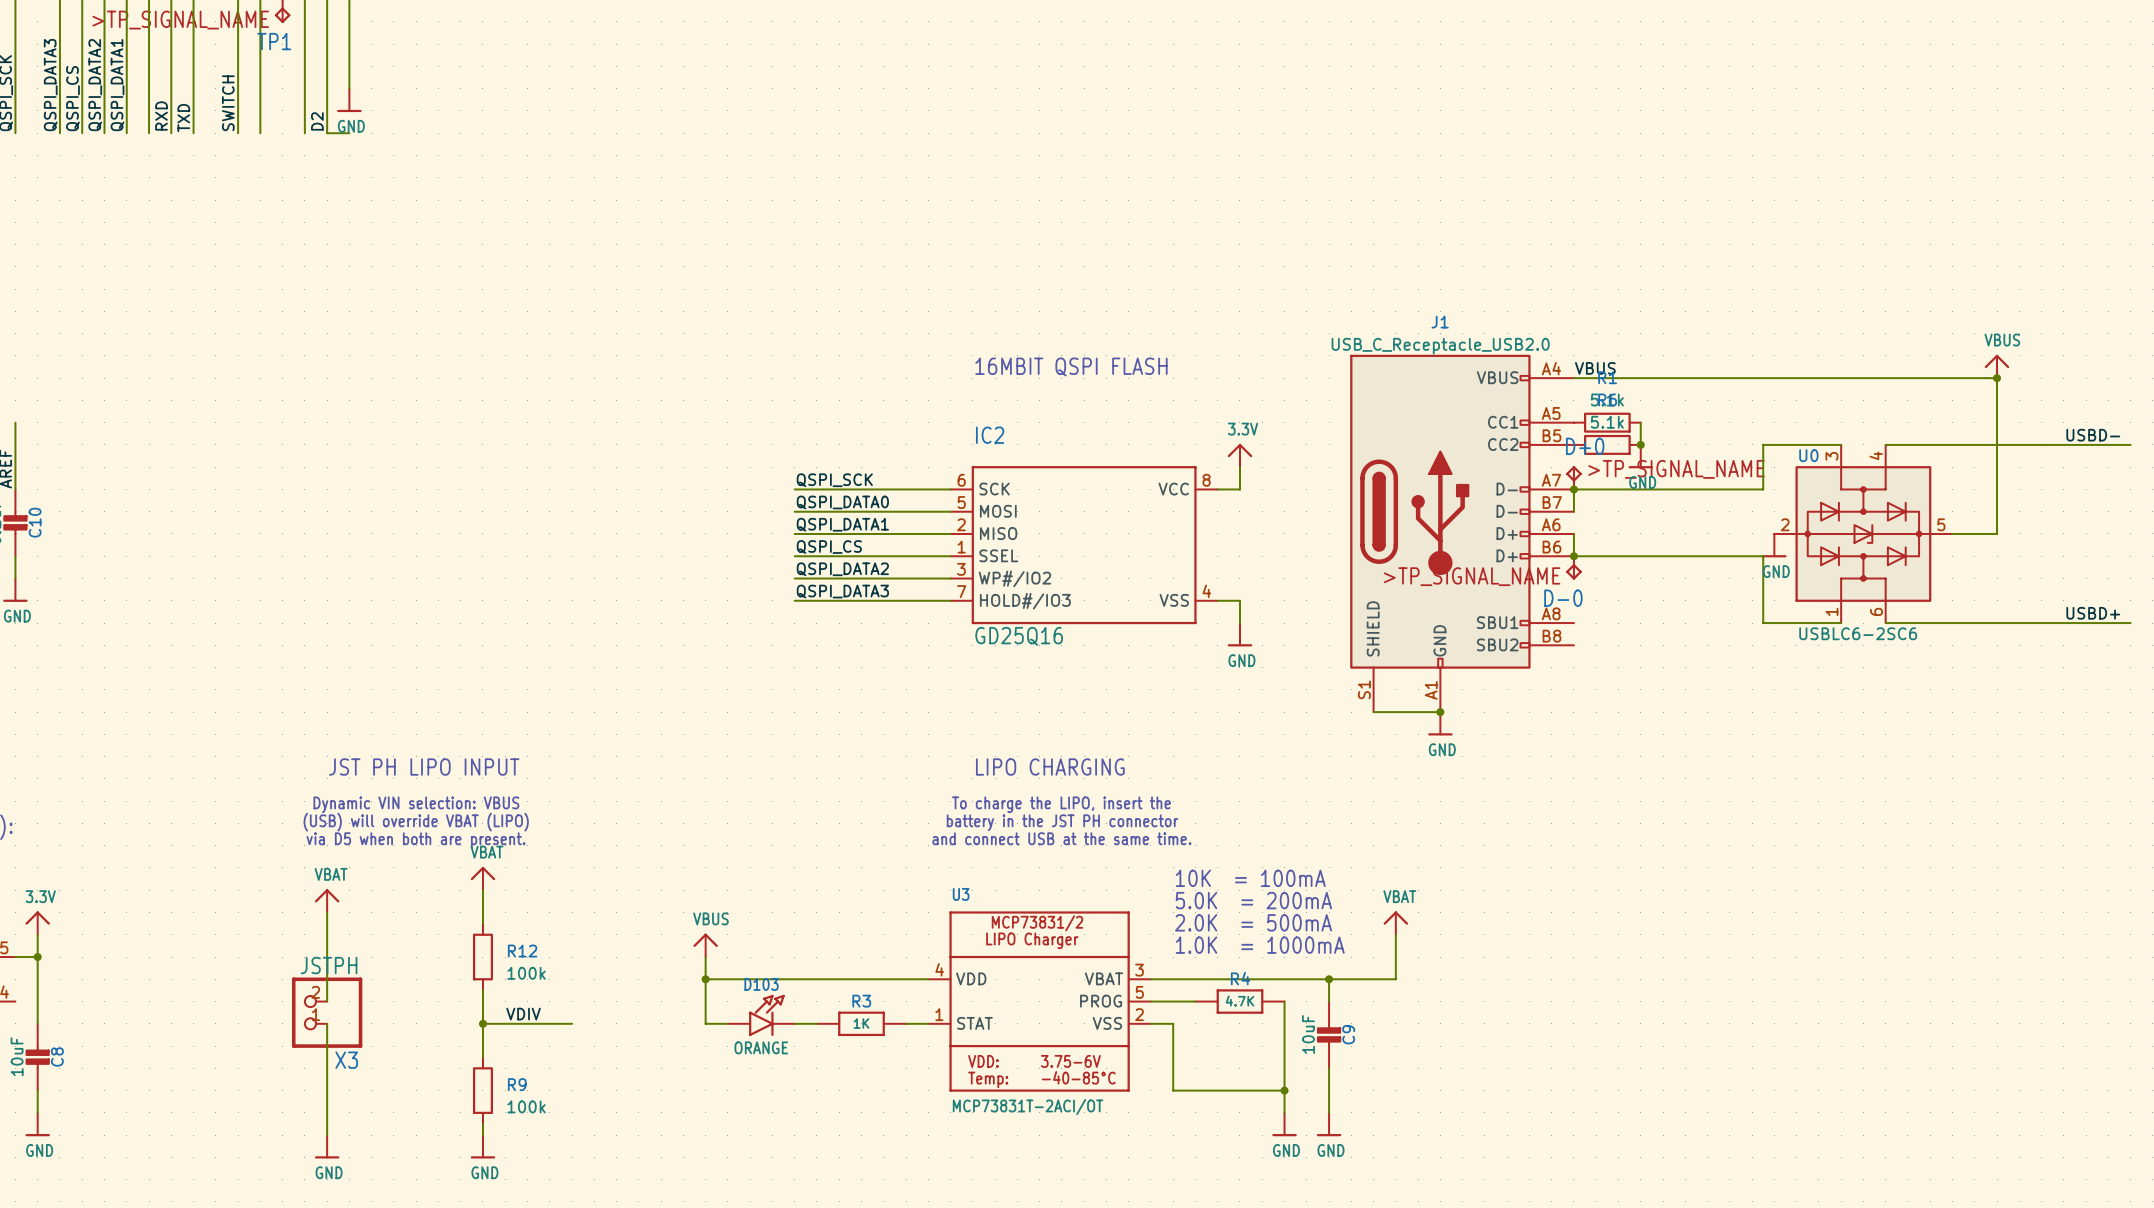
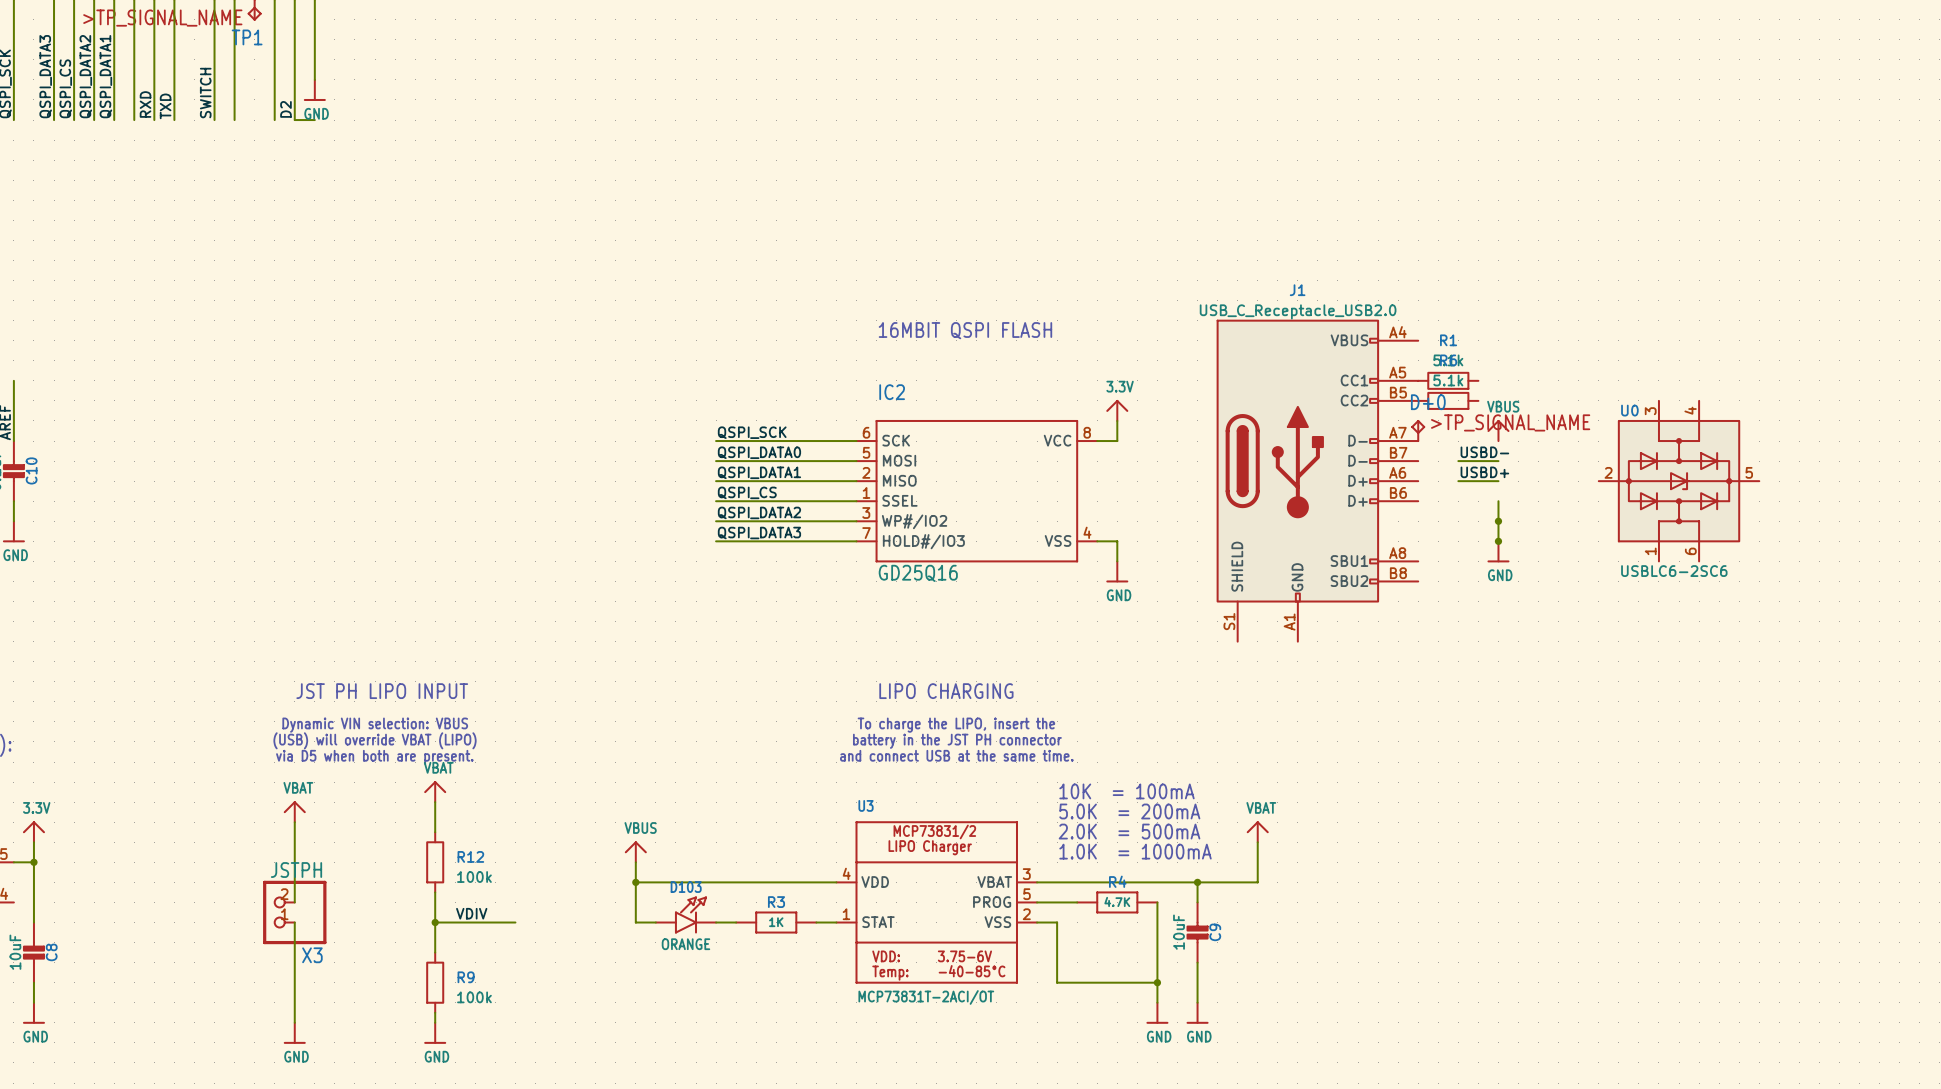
power symbol: VBUS (1997, 366) -> none
label: VBUS (1595, 368) -> none
wire: (1573, 378) (1997, 378) (1997, 533) (1952, 533) -> none
junction: (1997, 378) -> none
wire: (1640, 422) (1640, 444) -> none
label: USBD- (2093, 435) -> none
junction: (1640, 444) -> none
wire: (1841, 444) (1763, 444) (1763, 489) (1573, 489) (1573, 511) -> none
wire: (1885, 444) (2130, 444) -> none
power symbol: GND (1640, 456) -> none
power symbol: none -> VBUS (1498, 430)
junction: (1573, 489) -> none
label: none -> USBD- (1484, 452)
wire: none -> (1458, 461) (1498, 461)
label: none -> USBD+ (1484, 472)
wire: (1573, 533) (1573, 556) (1763, 556) (1763, 623) (1841, 623) -> none
wire: none -> (1458, 481) (1498, 481)
power symbol: GND (1774, 545) -> none
junction: (1573, 556) -> none
wire: none -> (1498, 501) (1498, 541)
D-0: (1573, 567) -> none
junction: none -> (1498, 521)
junction: none -> (1498, 541)
power symbol: none -> GND (1498, 551)
label: USBD+ (2093, 613) -> none
wire: (1885, 623) (2130, 623) -> none
wire: (1373, 712) (1440, 712) -> none
junction: (1440, 712) -> none
power symbol: GND (1440, 723) -> none

